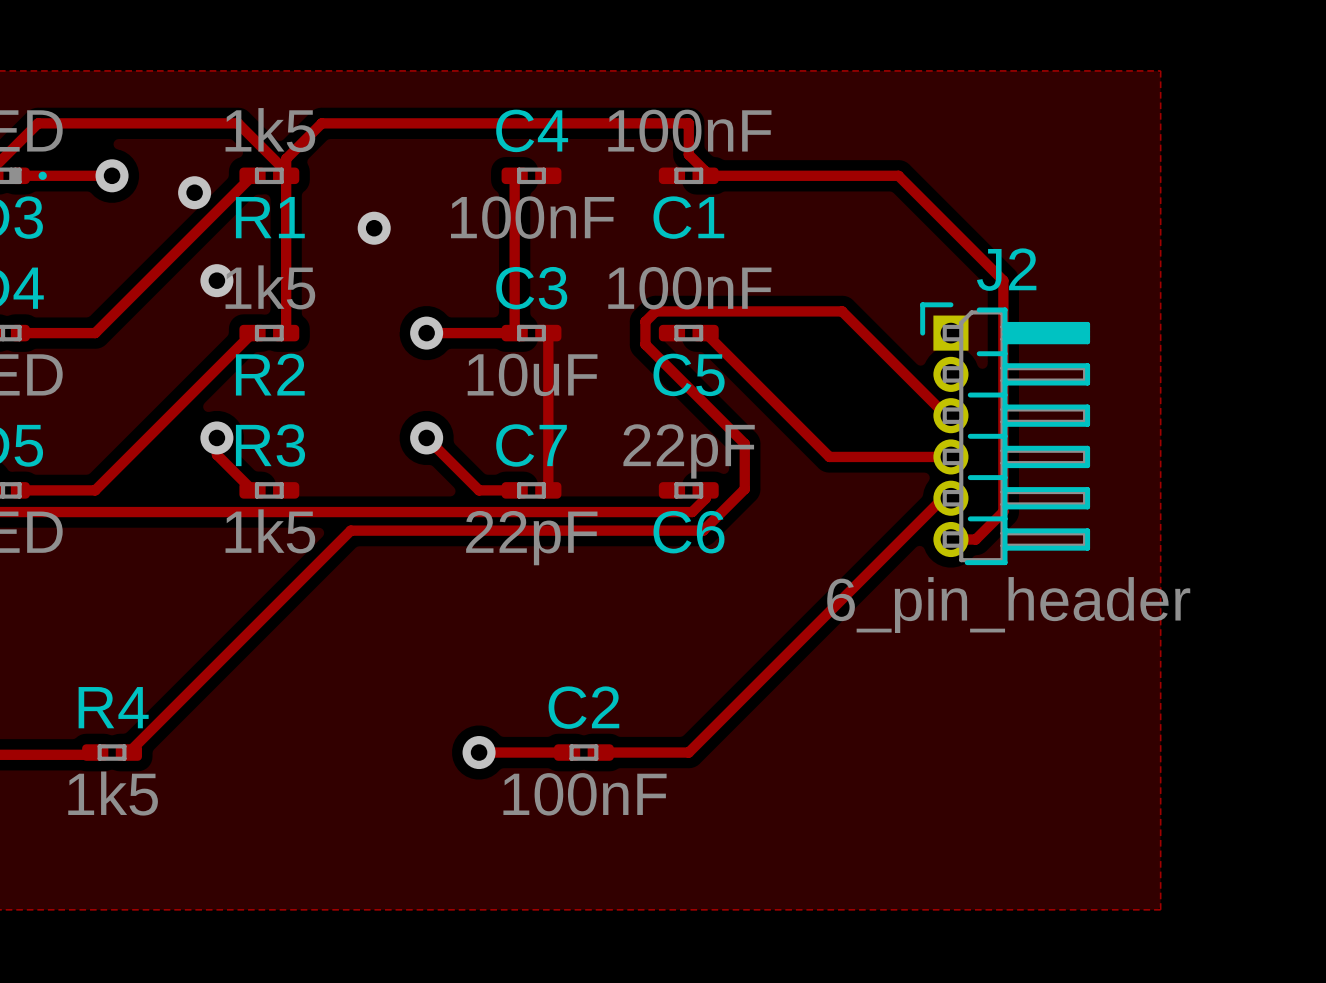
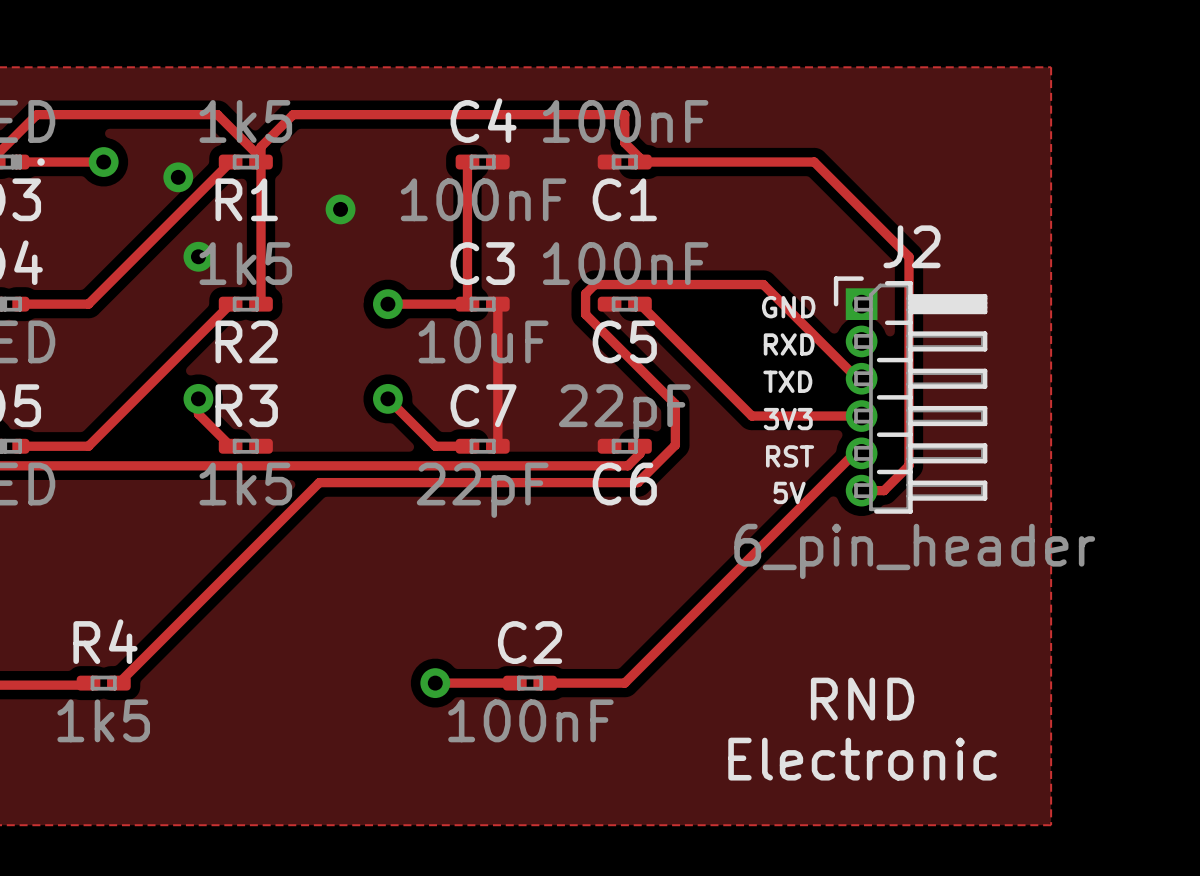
text: none -> GND (788, 307)
text: none -> RXD (789, 344)
text: none -> TXD (787, 381)
text: none -> 3V3 (788, 419)
text: none -> RST (790, 456)
text: none -> 5V (789, 492)
text: none -> RND (862, 699)
text: none -> Electronic (862, 759)

